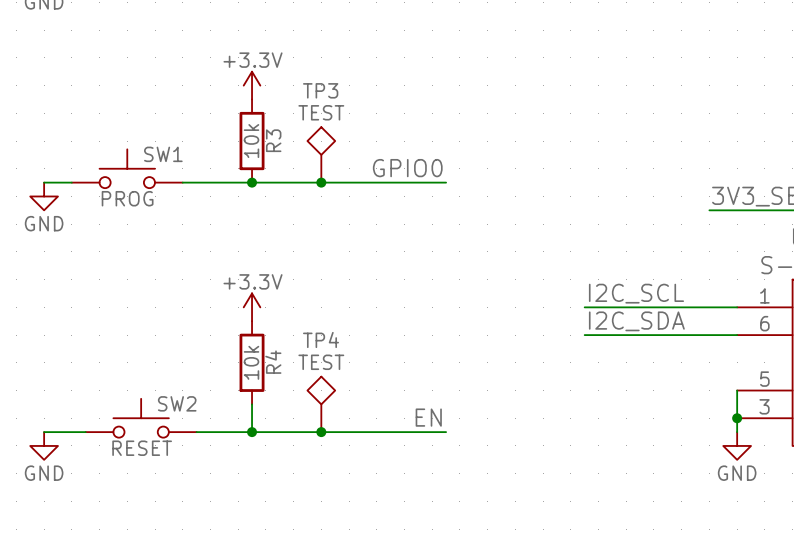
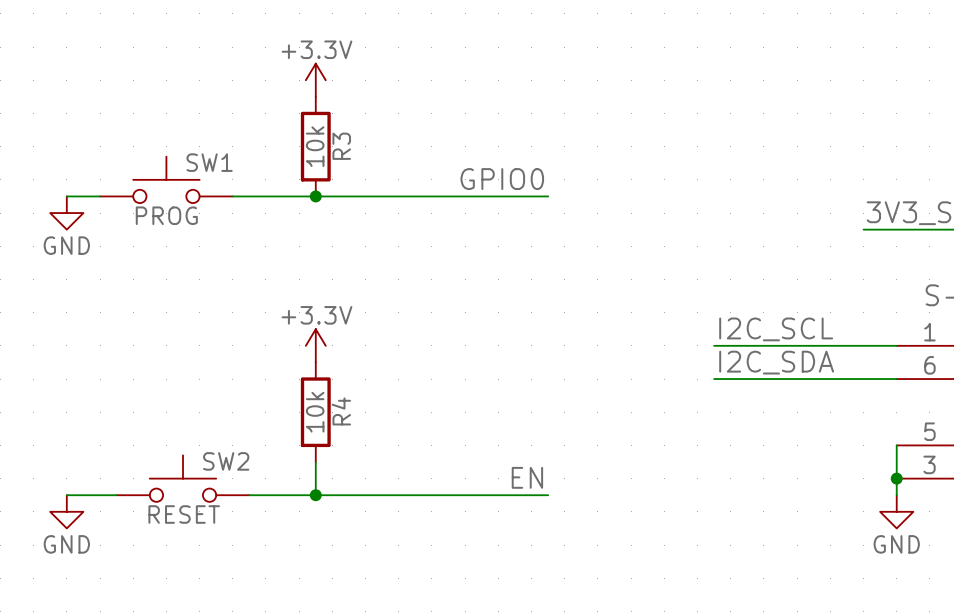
TP3: TEST (321, 154) -> none
junction: (321, 182) -> none
TP4: TEST (321, 404) -> none
junction: (321, 432) -> none

